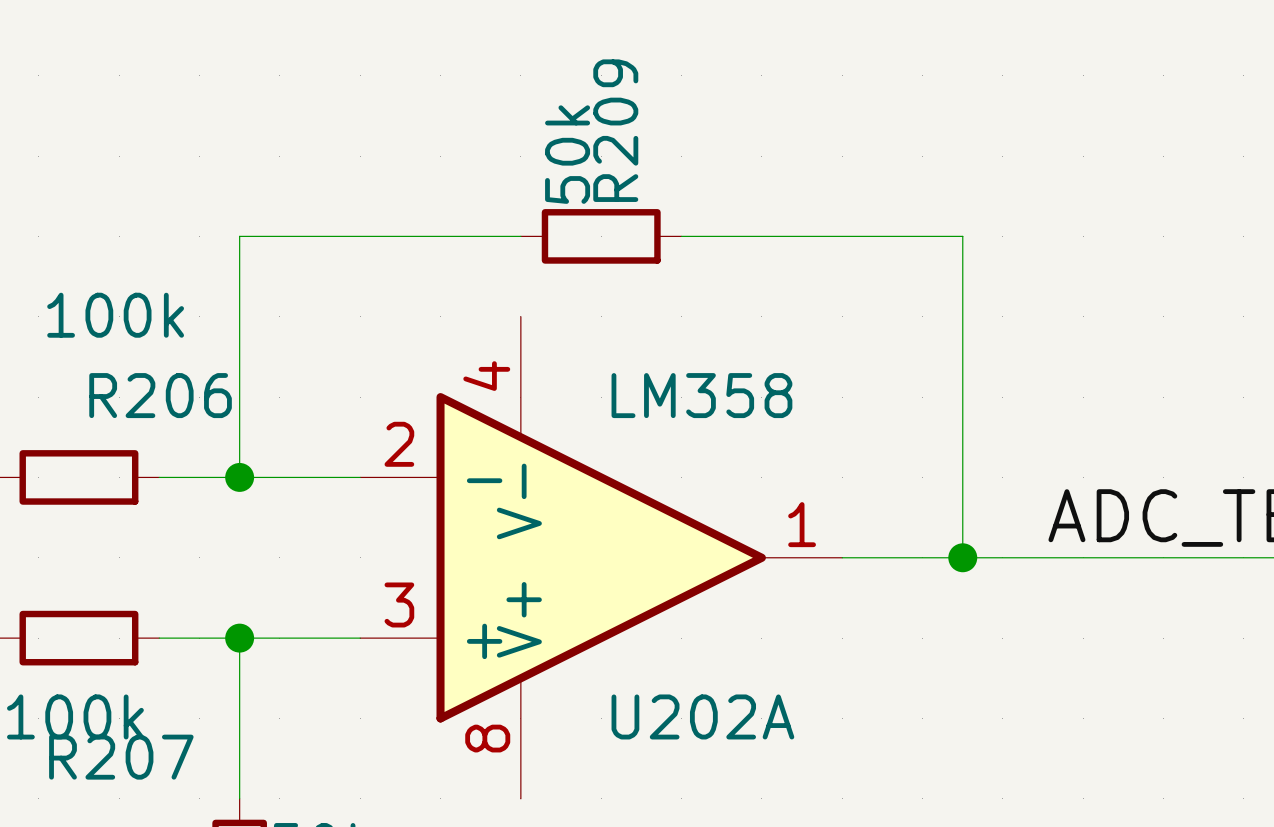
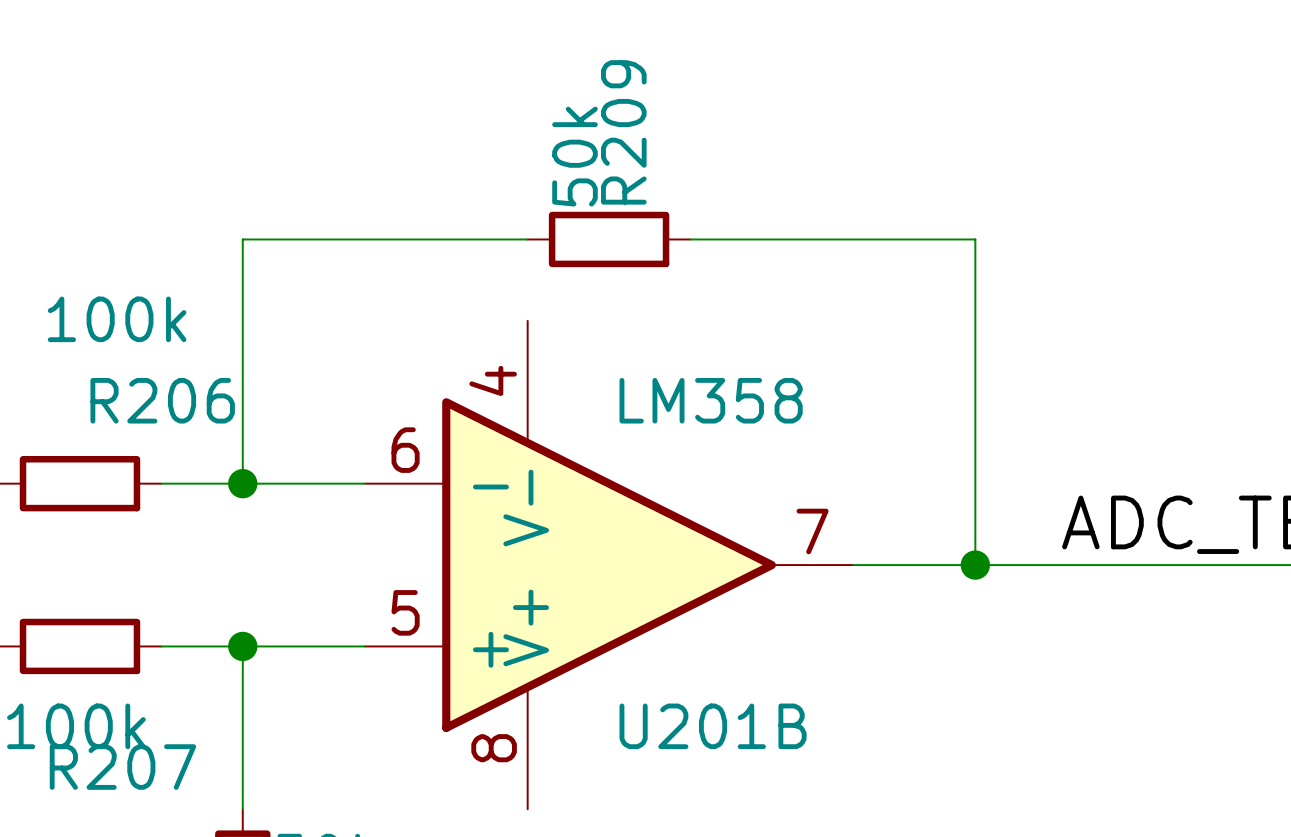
U202A pin number: 2 (399, 444) -> 6 (405, 450)
U202A pin number: 1 (802, 524) -> 7 (812, 531)
U202A pin number: 3 (399, 604) -> 5 (405, 612)
U202A name: U202A (702, 716) -> U201B (713, 726)

